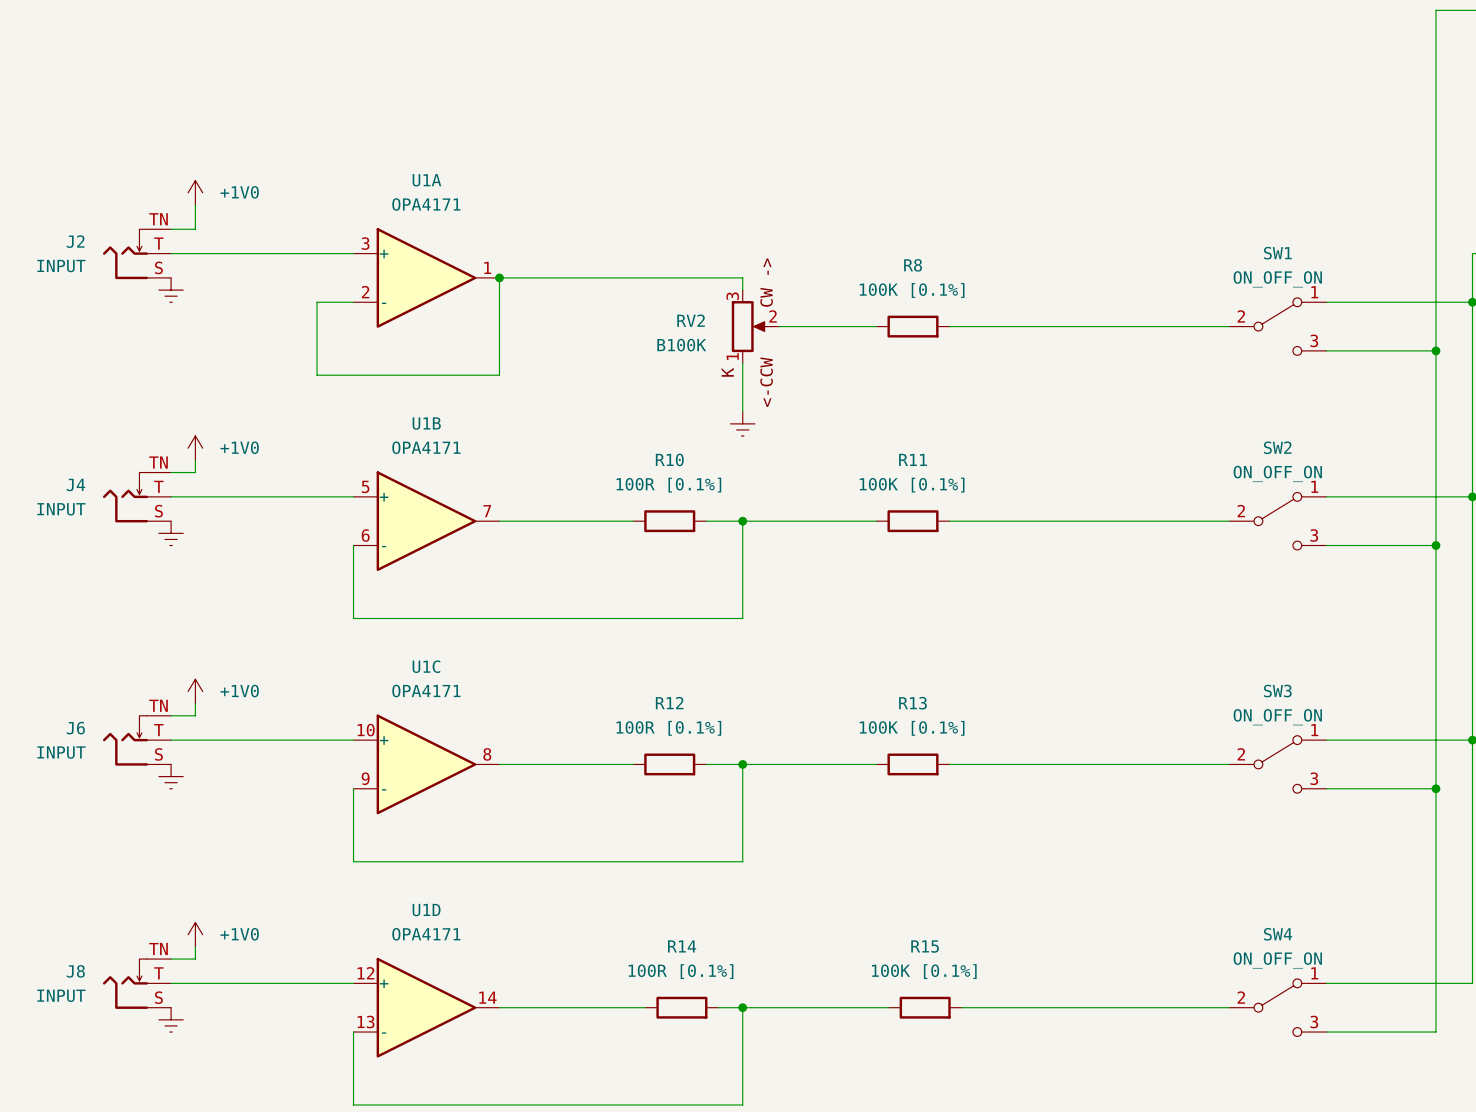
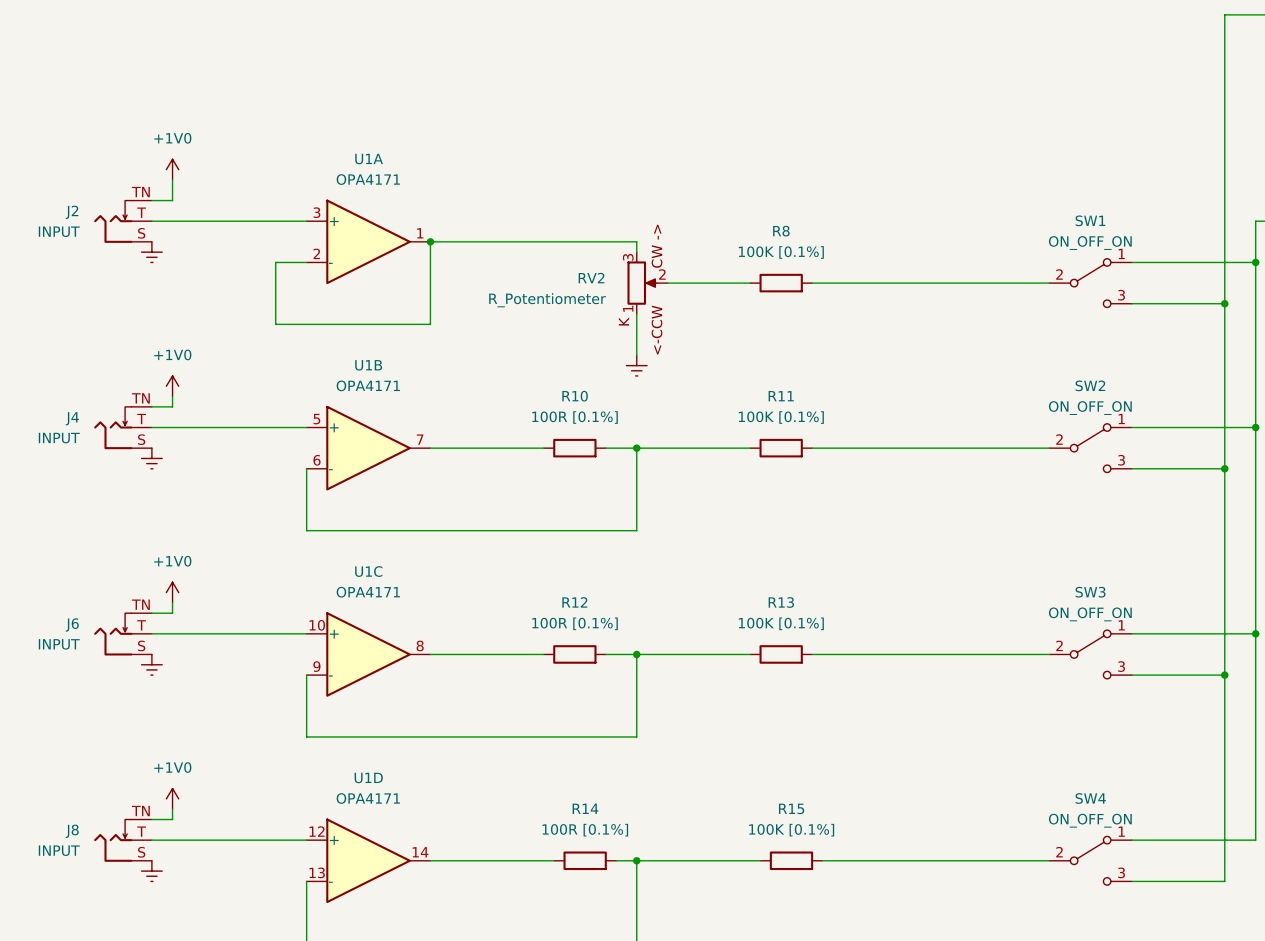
power symbol text position: +1V0 (239, 192) -> +1V0 (172, 138)
RV2 value: B100K (681, 345) -> R_Potentiometer (547, 300)
power symbol text position: +1V0 (239, 447) -> +1V0 (172, 354)
power symbol text position: +1V0 (239, 691) -> +1V0 (172, 561)
power symbol text position: +1V0 (239, 934) -> +1V0 (172, 767)

